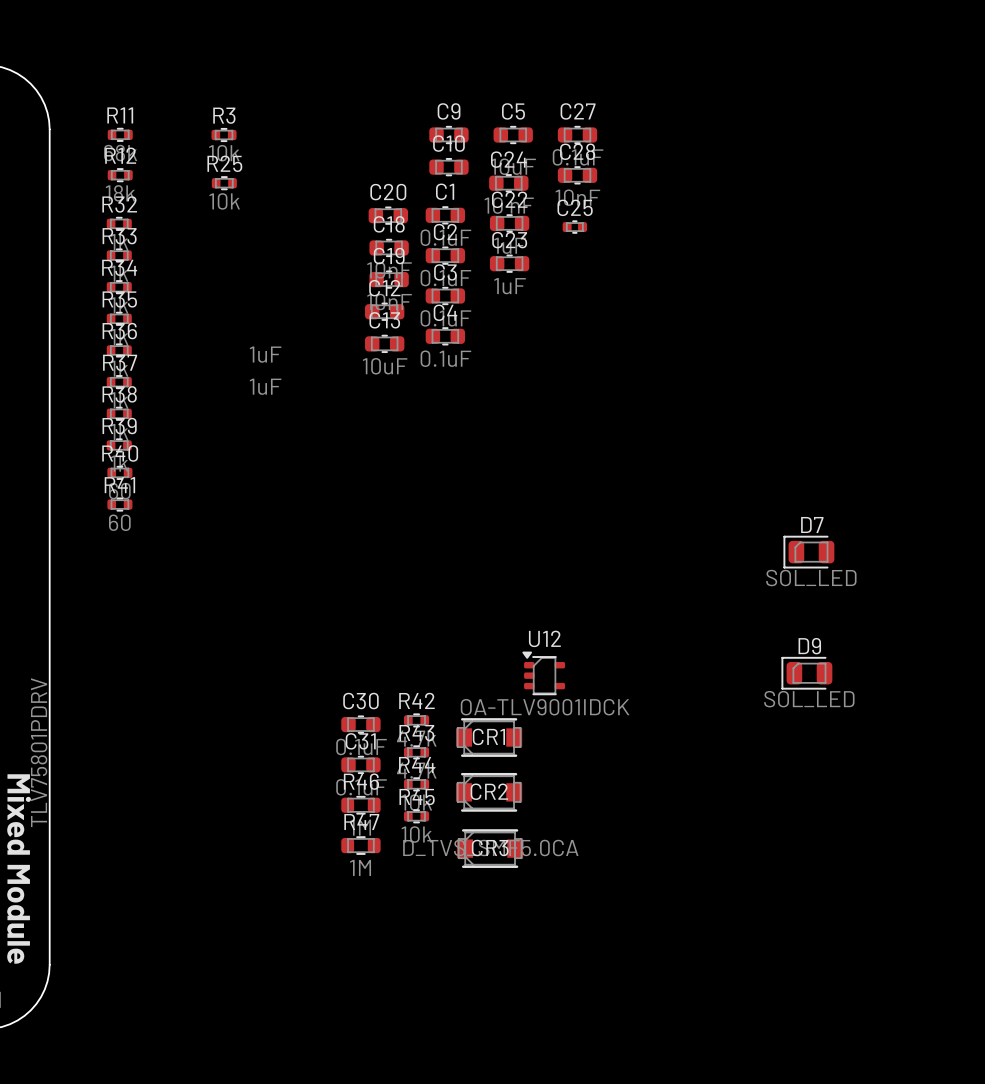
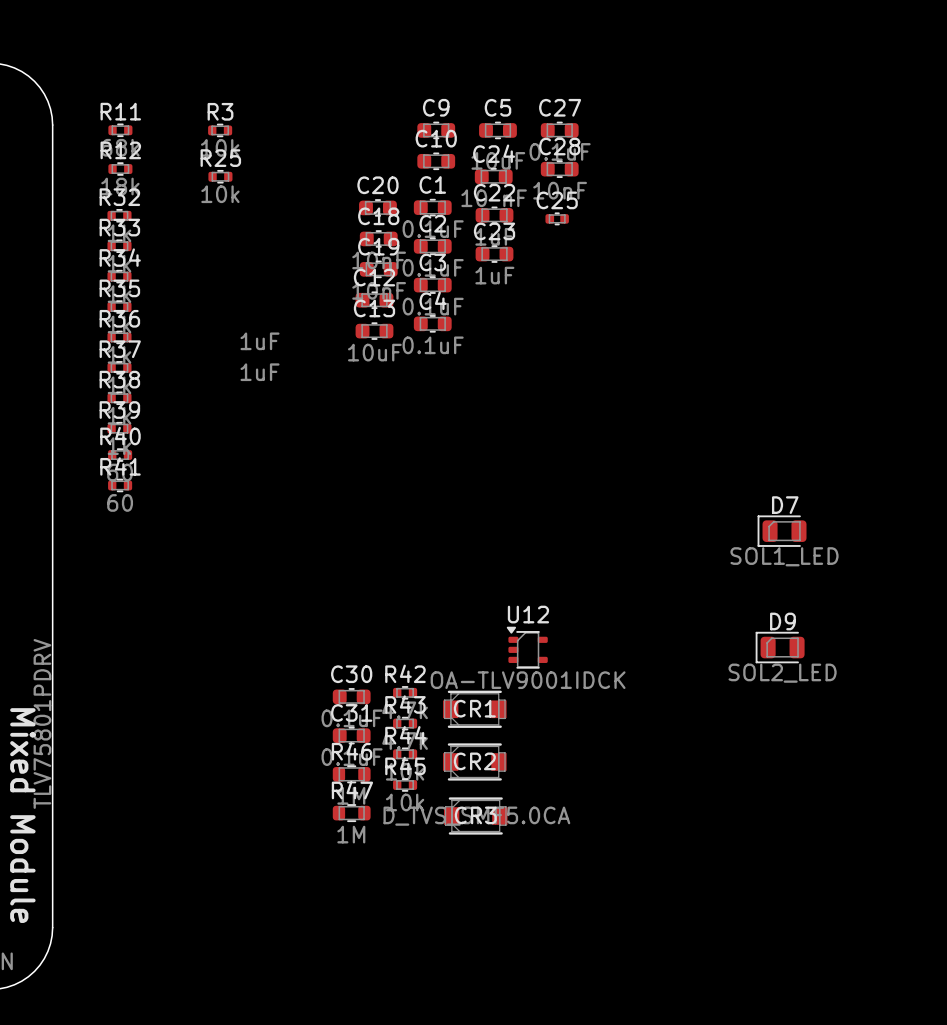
D7 value: SOL_LED (811, 578) -> SOL1_LED (784, 556)
D9 value: SOL_LED (809, 699) -> SOL2_LED (782, 673)

